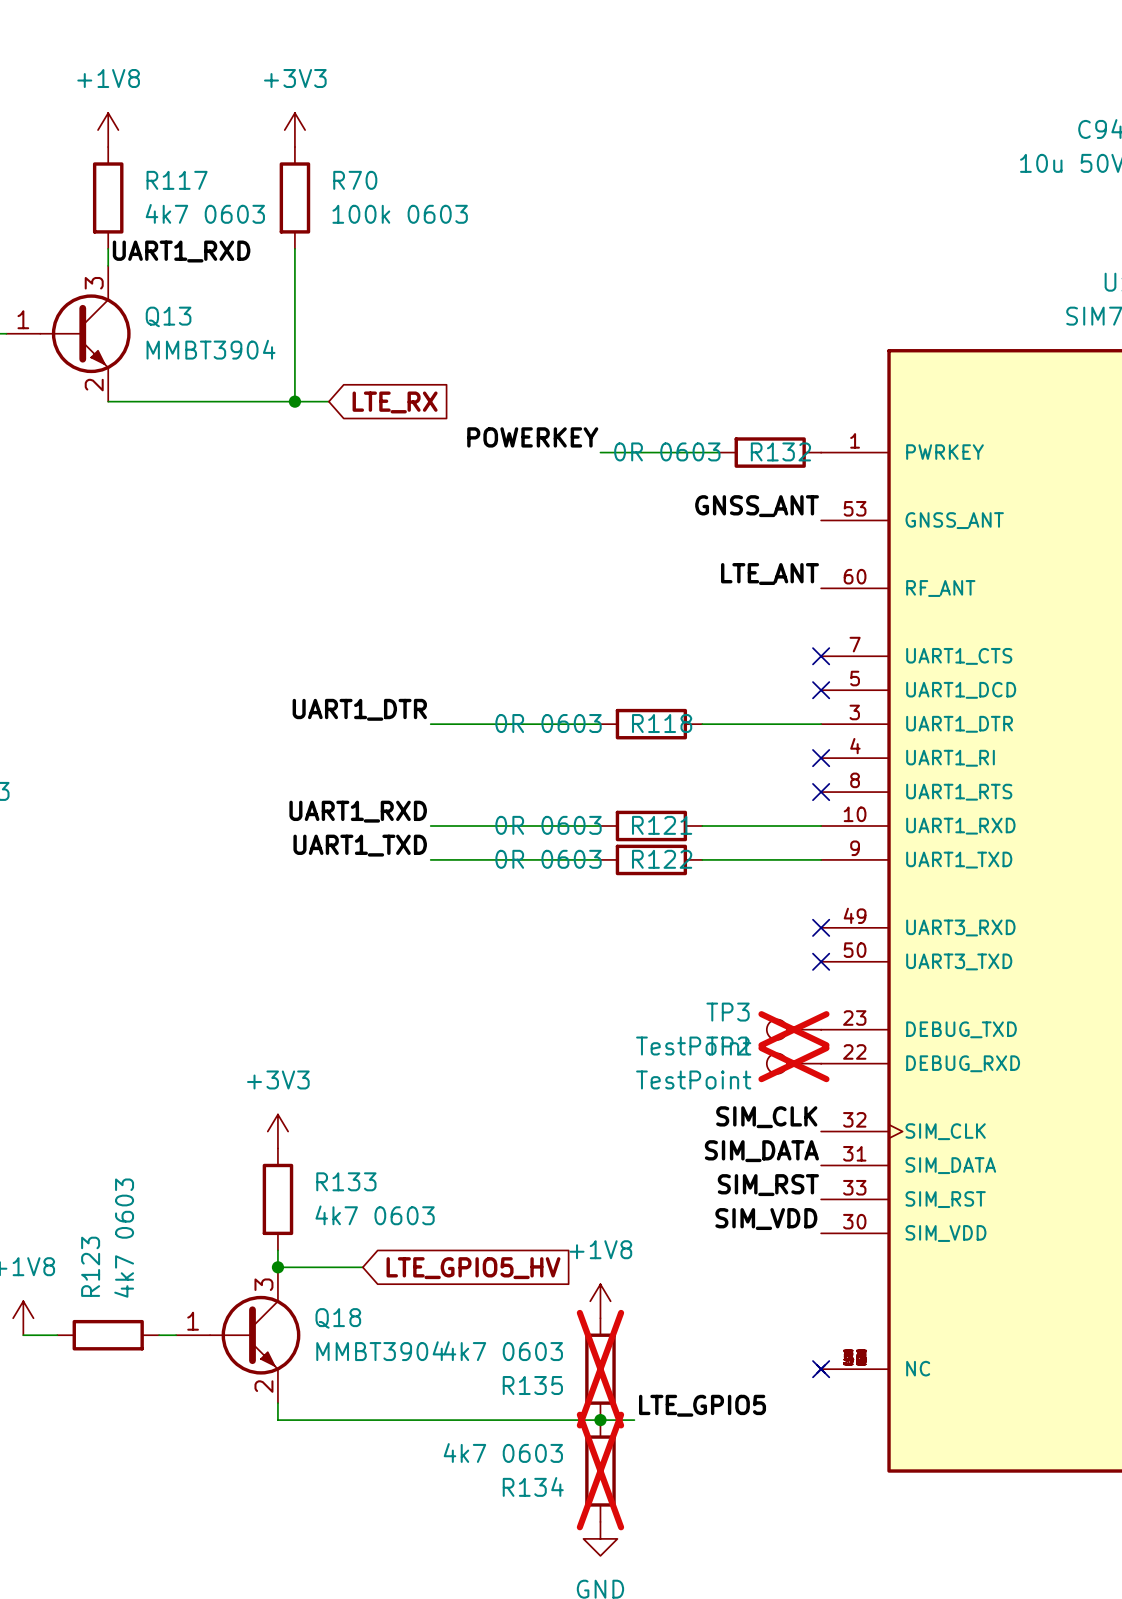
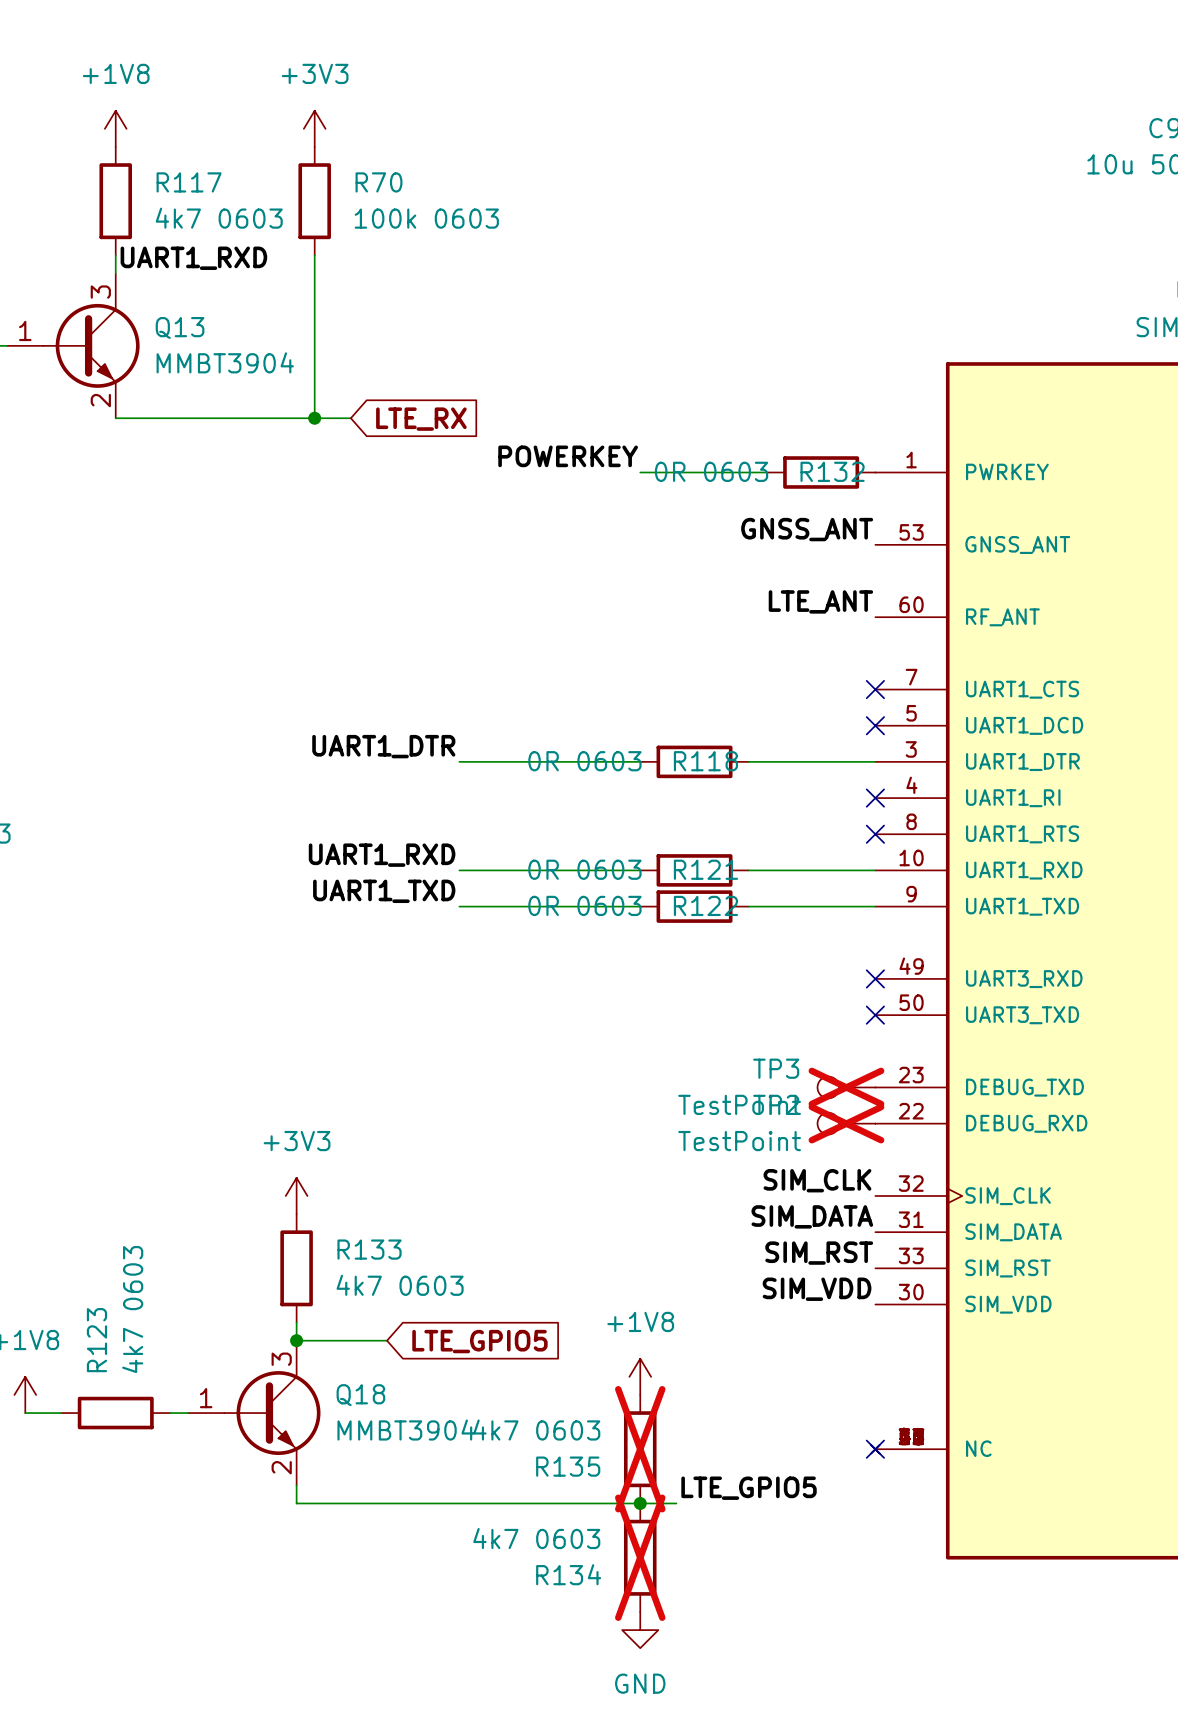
global label: LTE_GPIO5_HV (473, 1268) -> LTE_GPIO5 (479, 1341)

